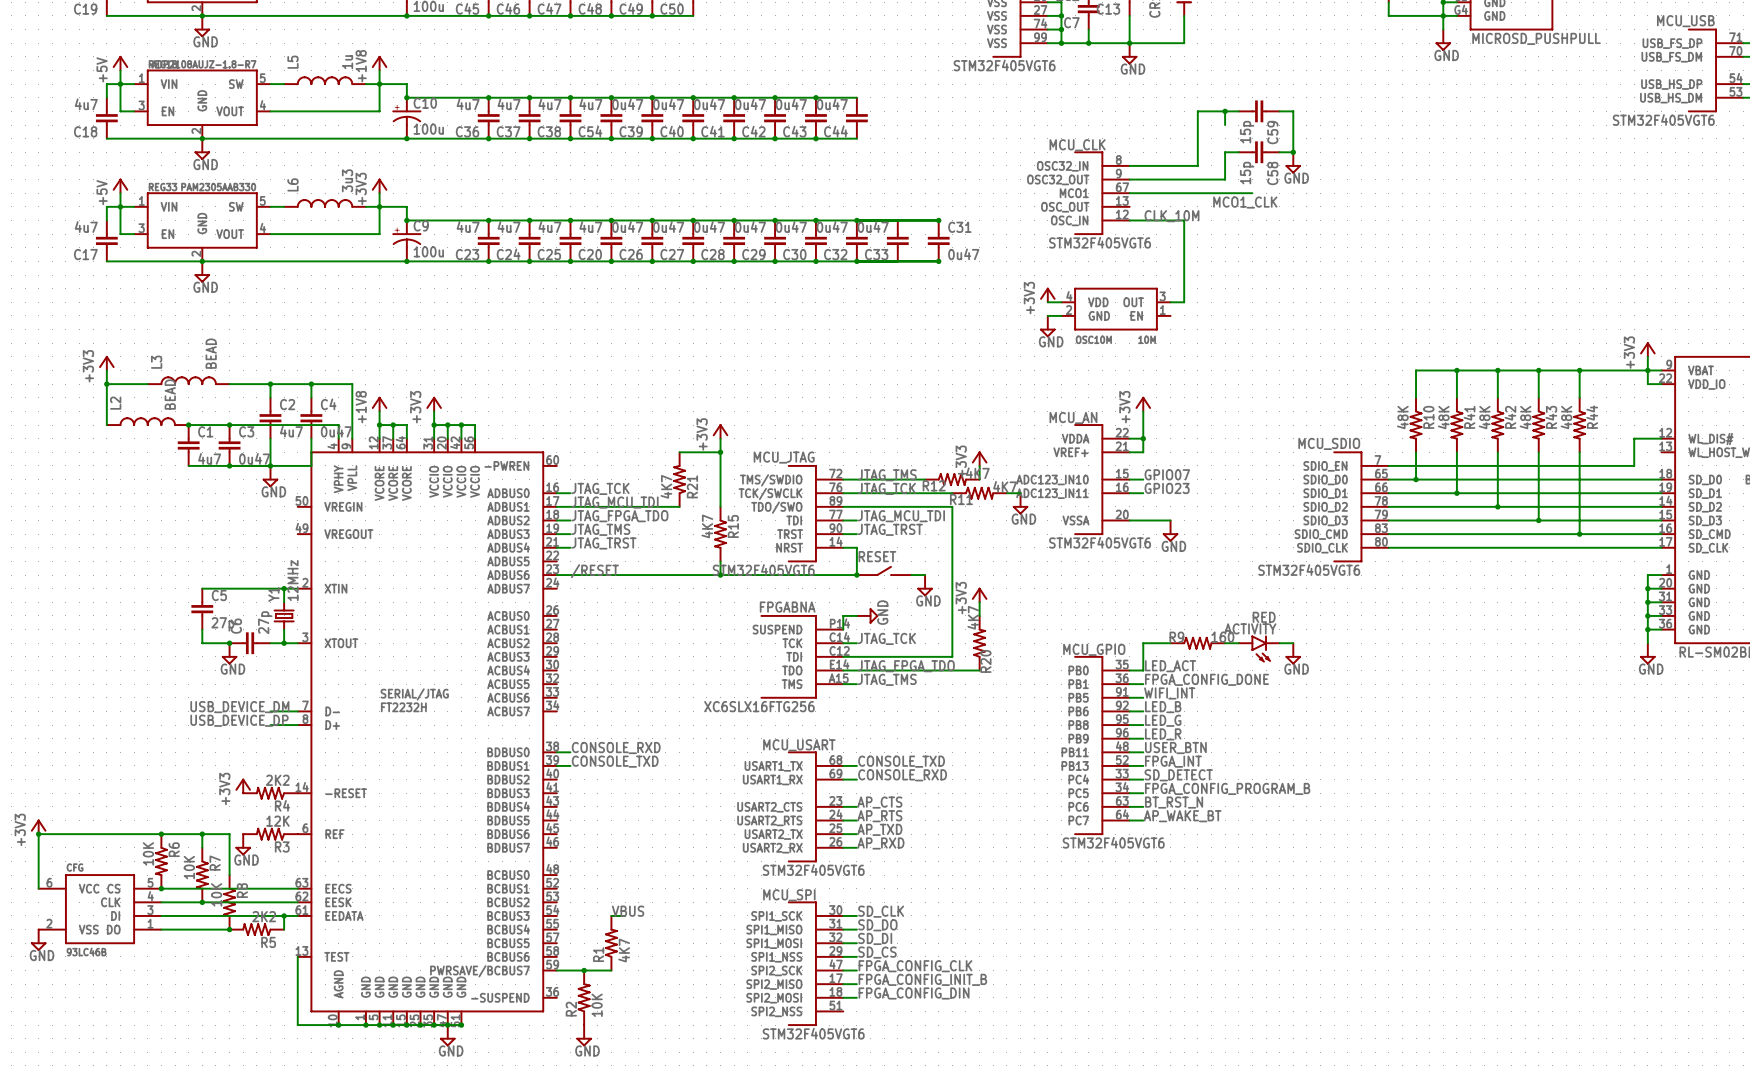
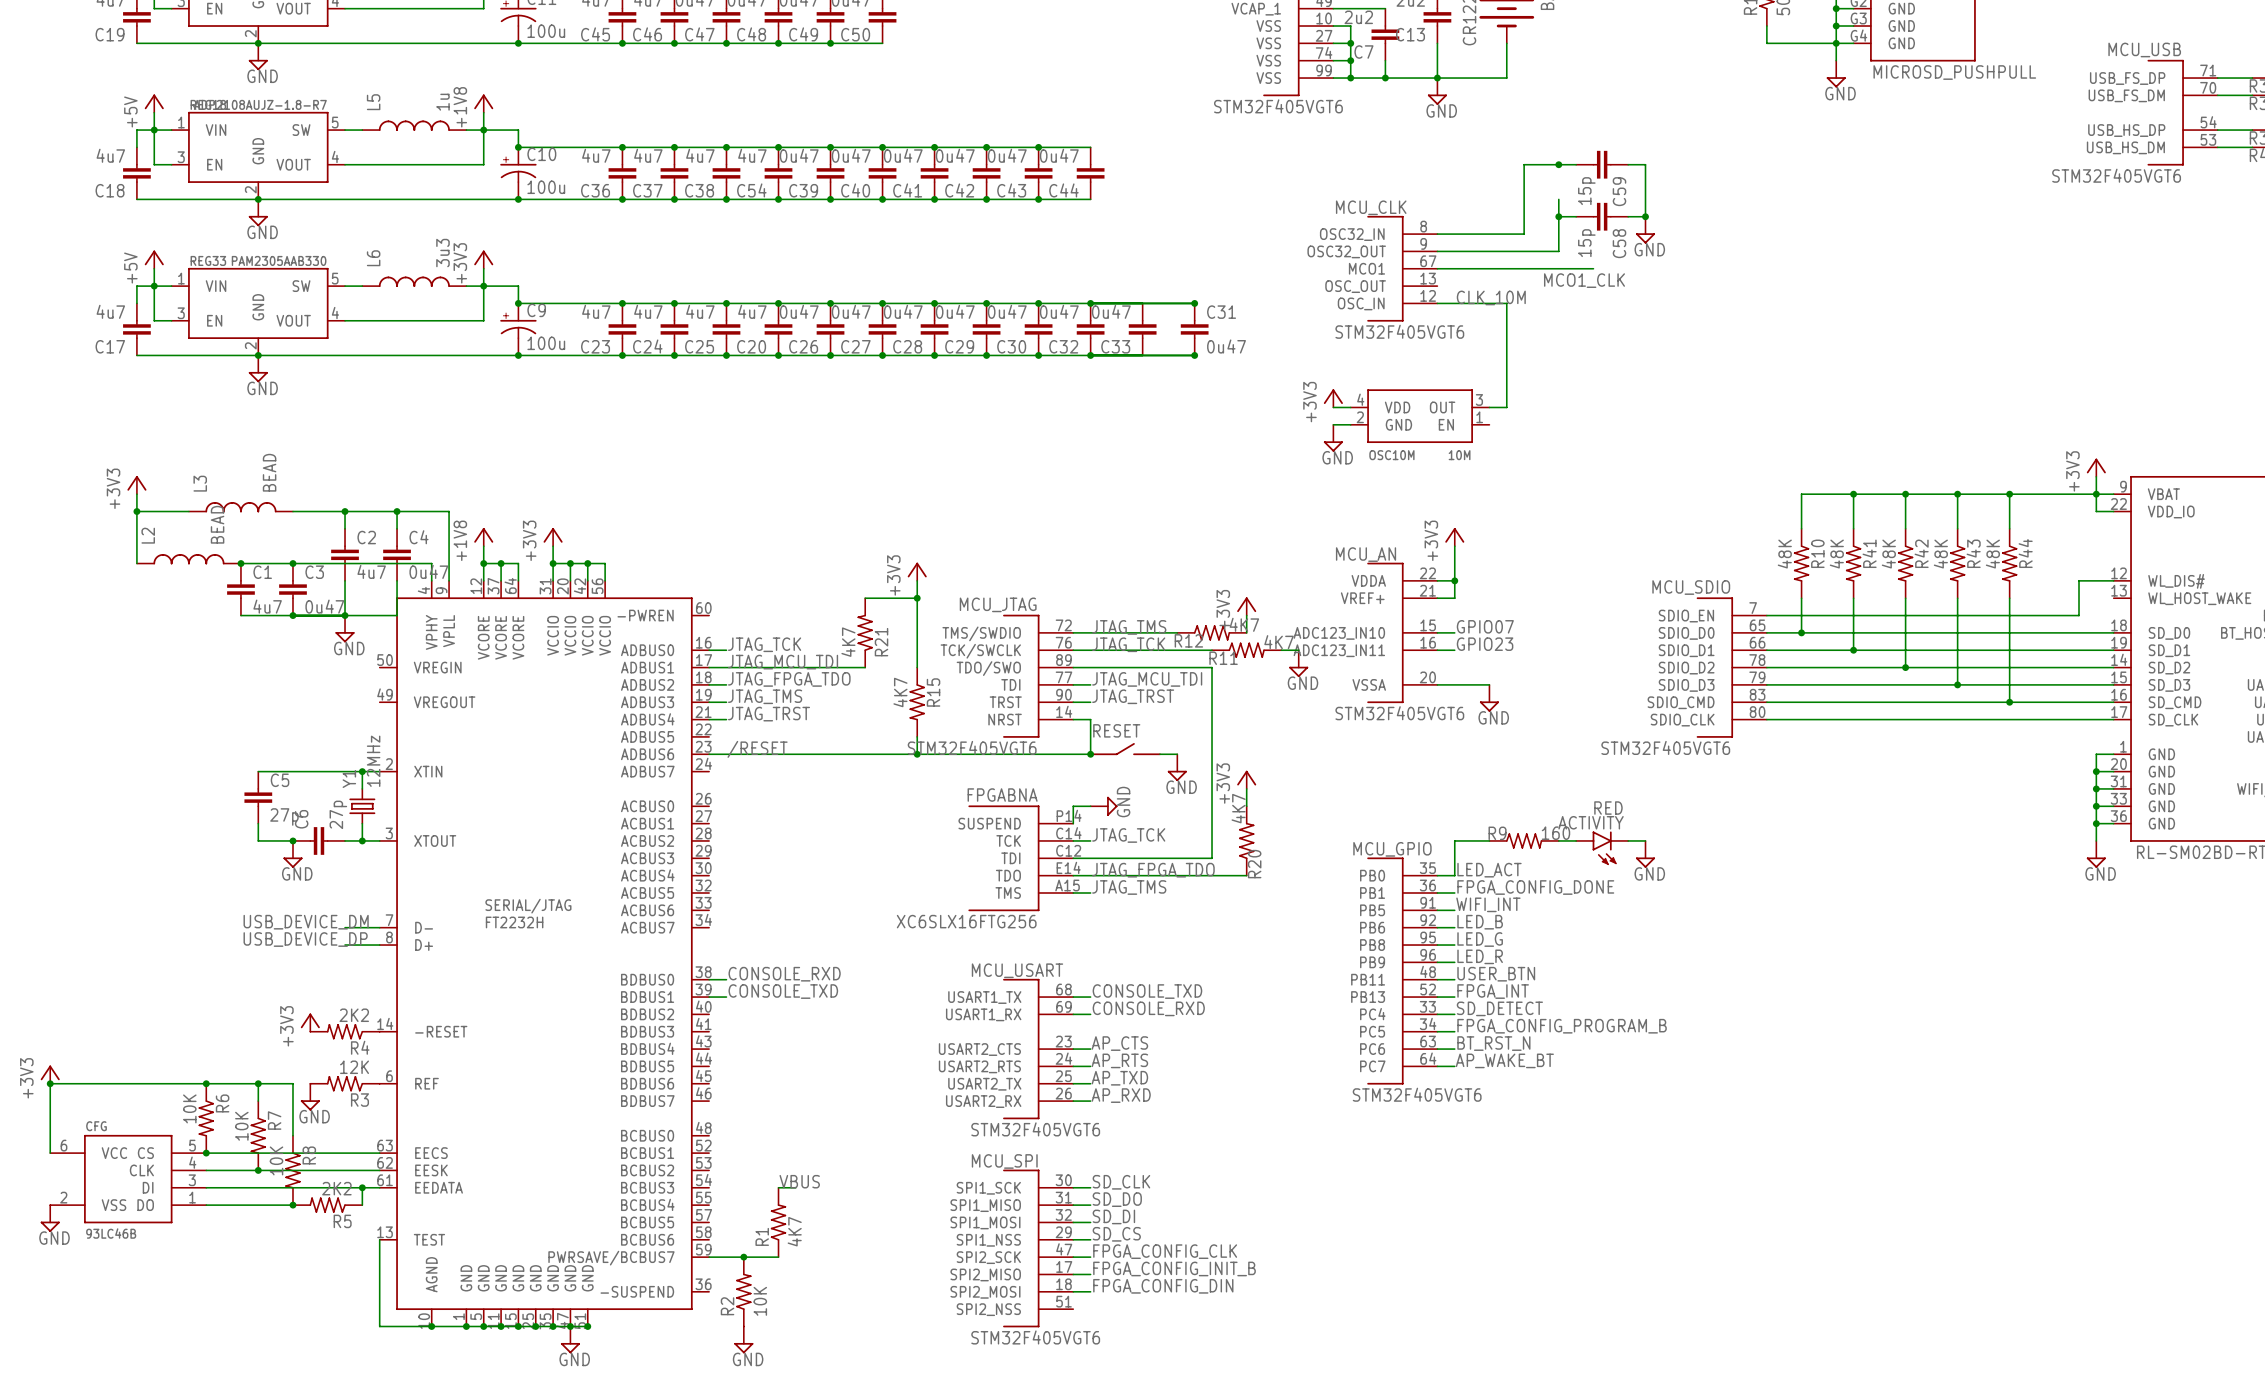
wire: (1225, 111) (1225, 125) -> (1558, 199) (1558, 216)
junction: none -> (1558, 216)

